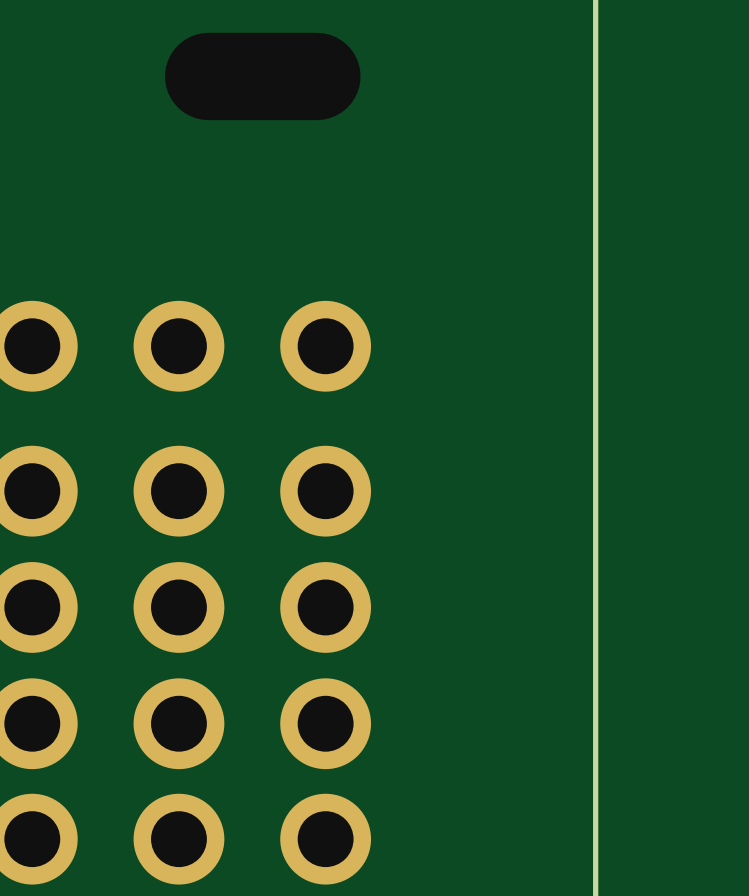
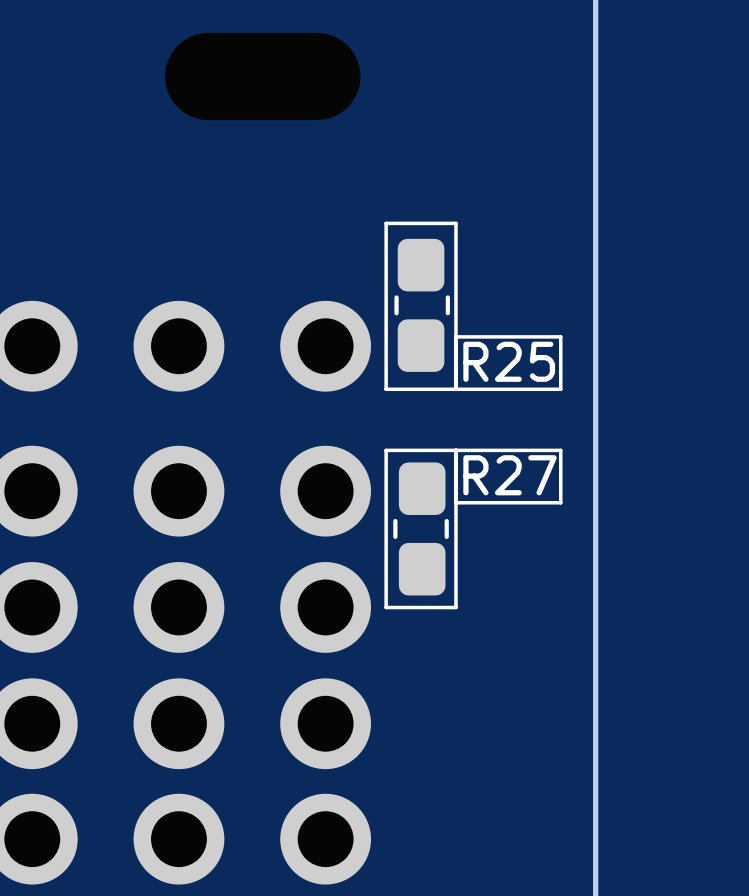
R25: none -> (422, 305)
line: none -> (455, 336) (560, 336) (560, 389) (386, 389) (386, 223) (455, 223) (455, 389)
line: none -> (455, 450) (455, 607) (386, 607) (386, 450) (560, 450) (560, 502) (455, 502)
R27: none -> (421, 528)

